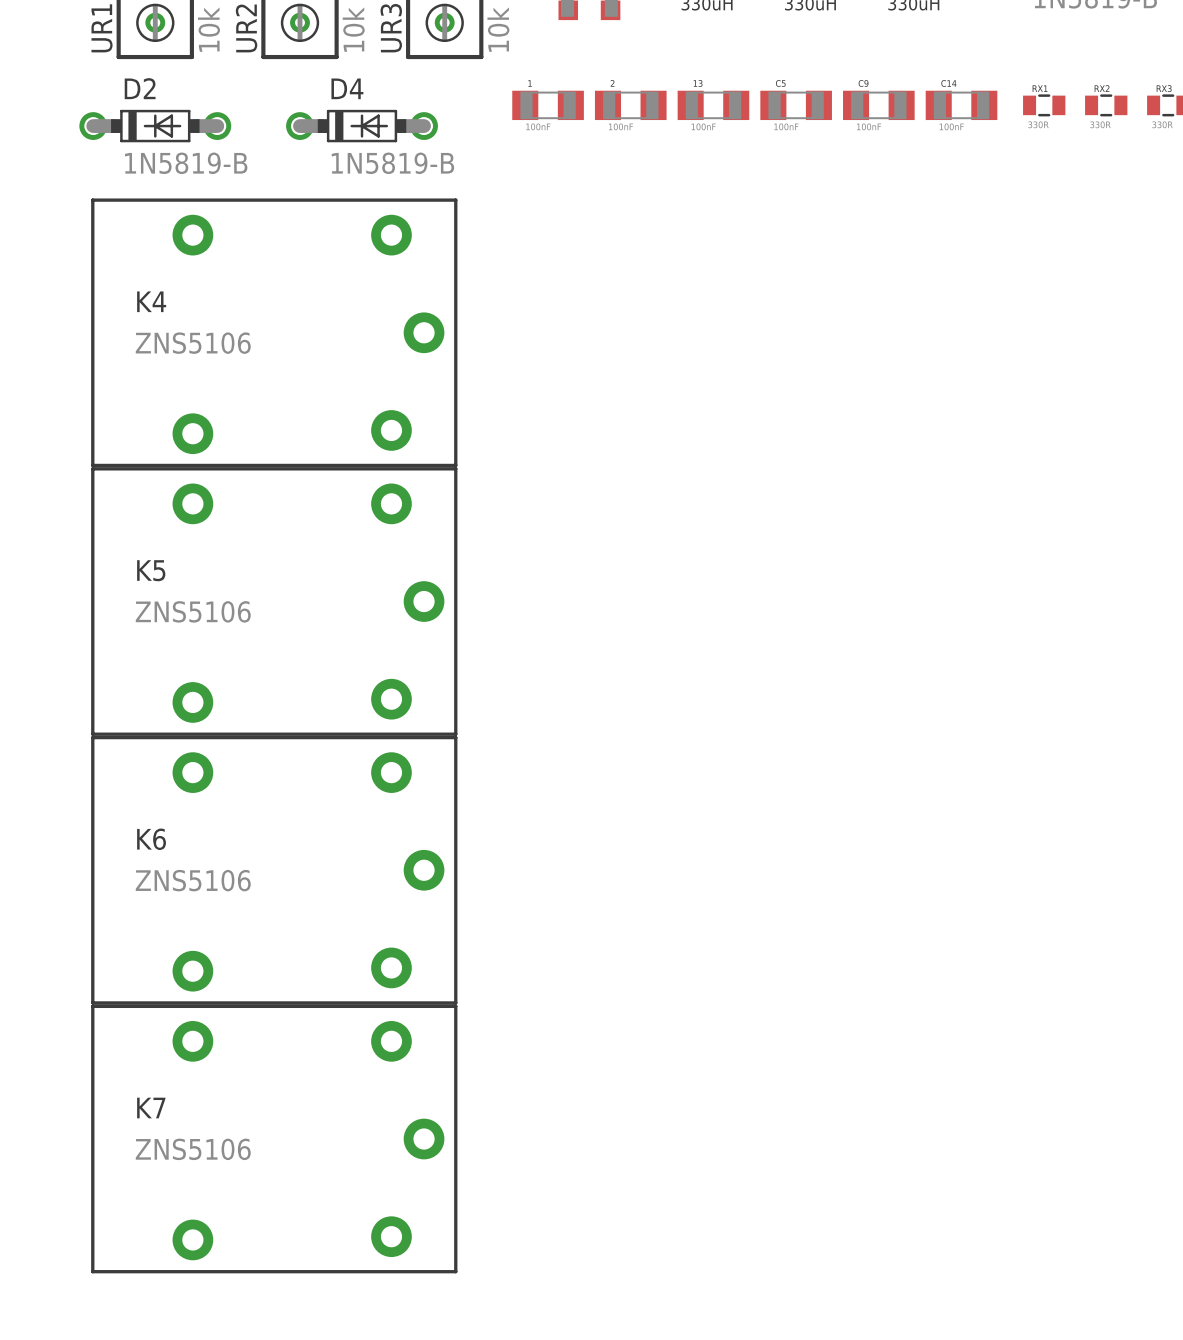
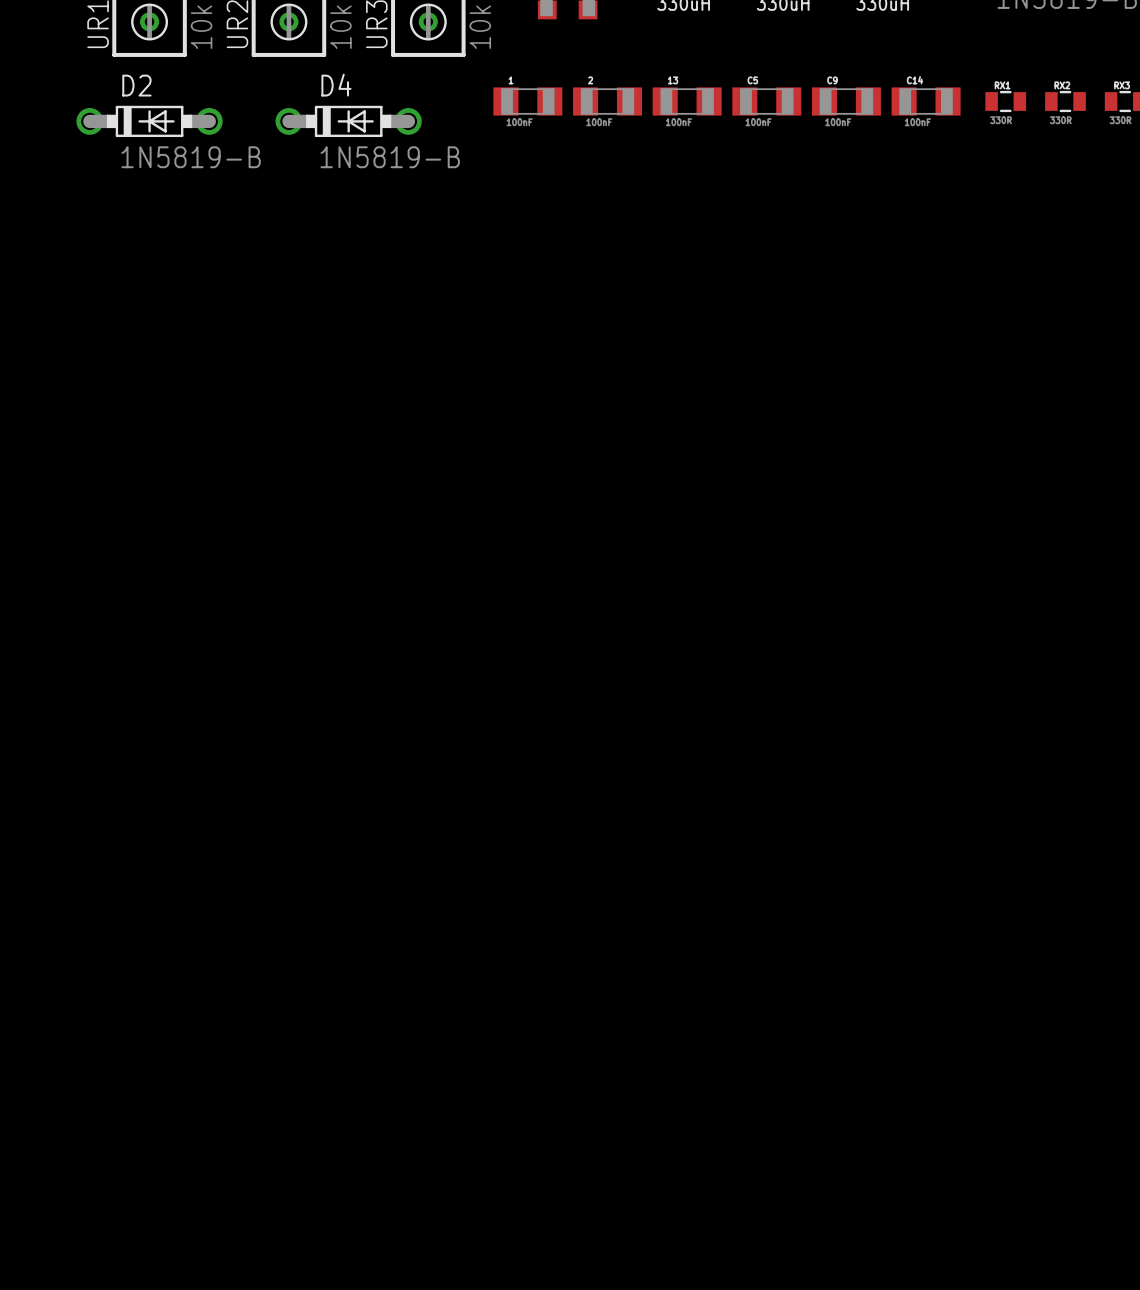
K4: ZNS5106 (274, 332) -> none
K5: ZNS5106 (274, 601) -> none
K6: ZNS5106 (274, 870) -> none
K7: ZNS5106 (274, 1139) -> none

